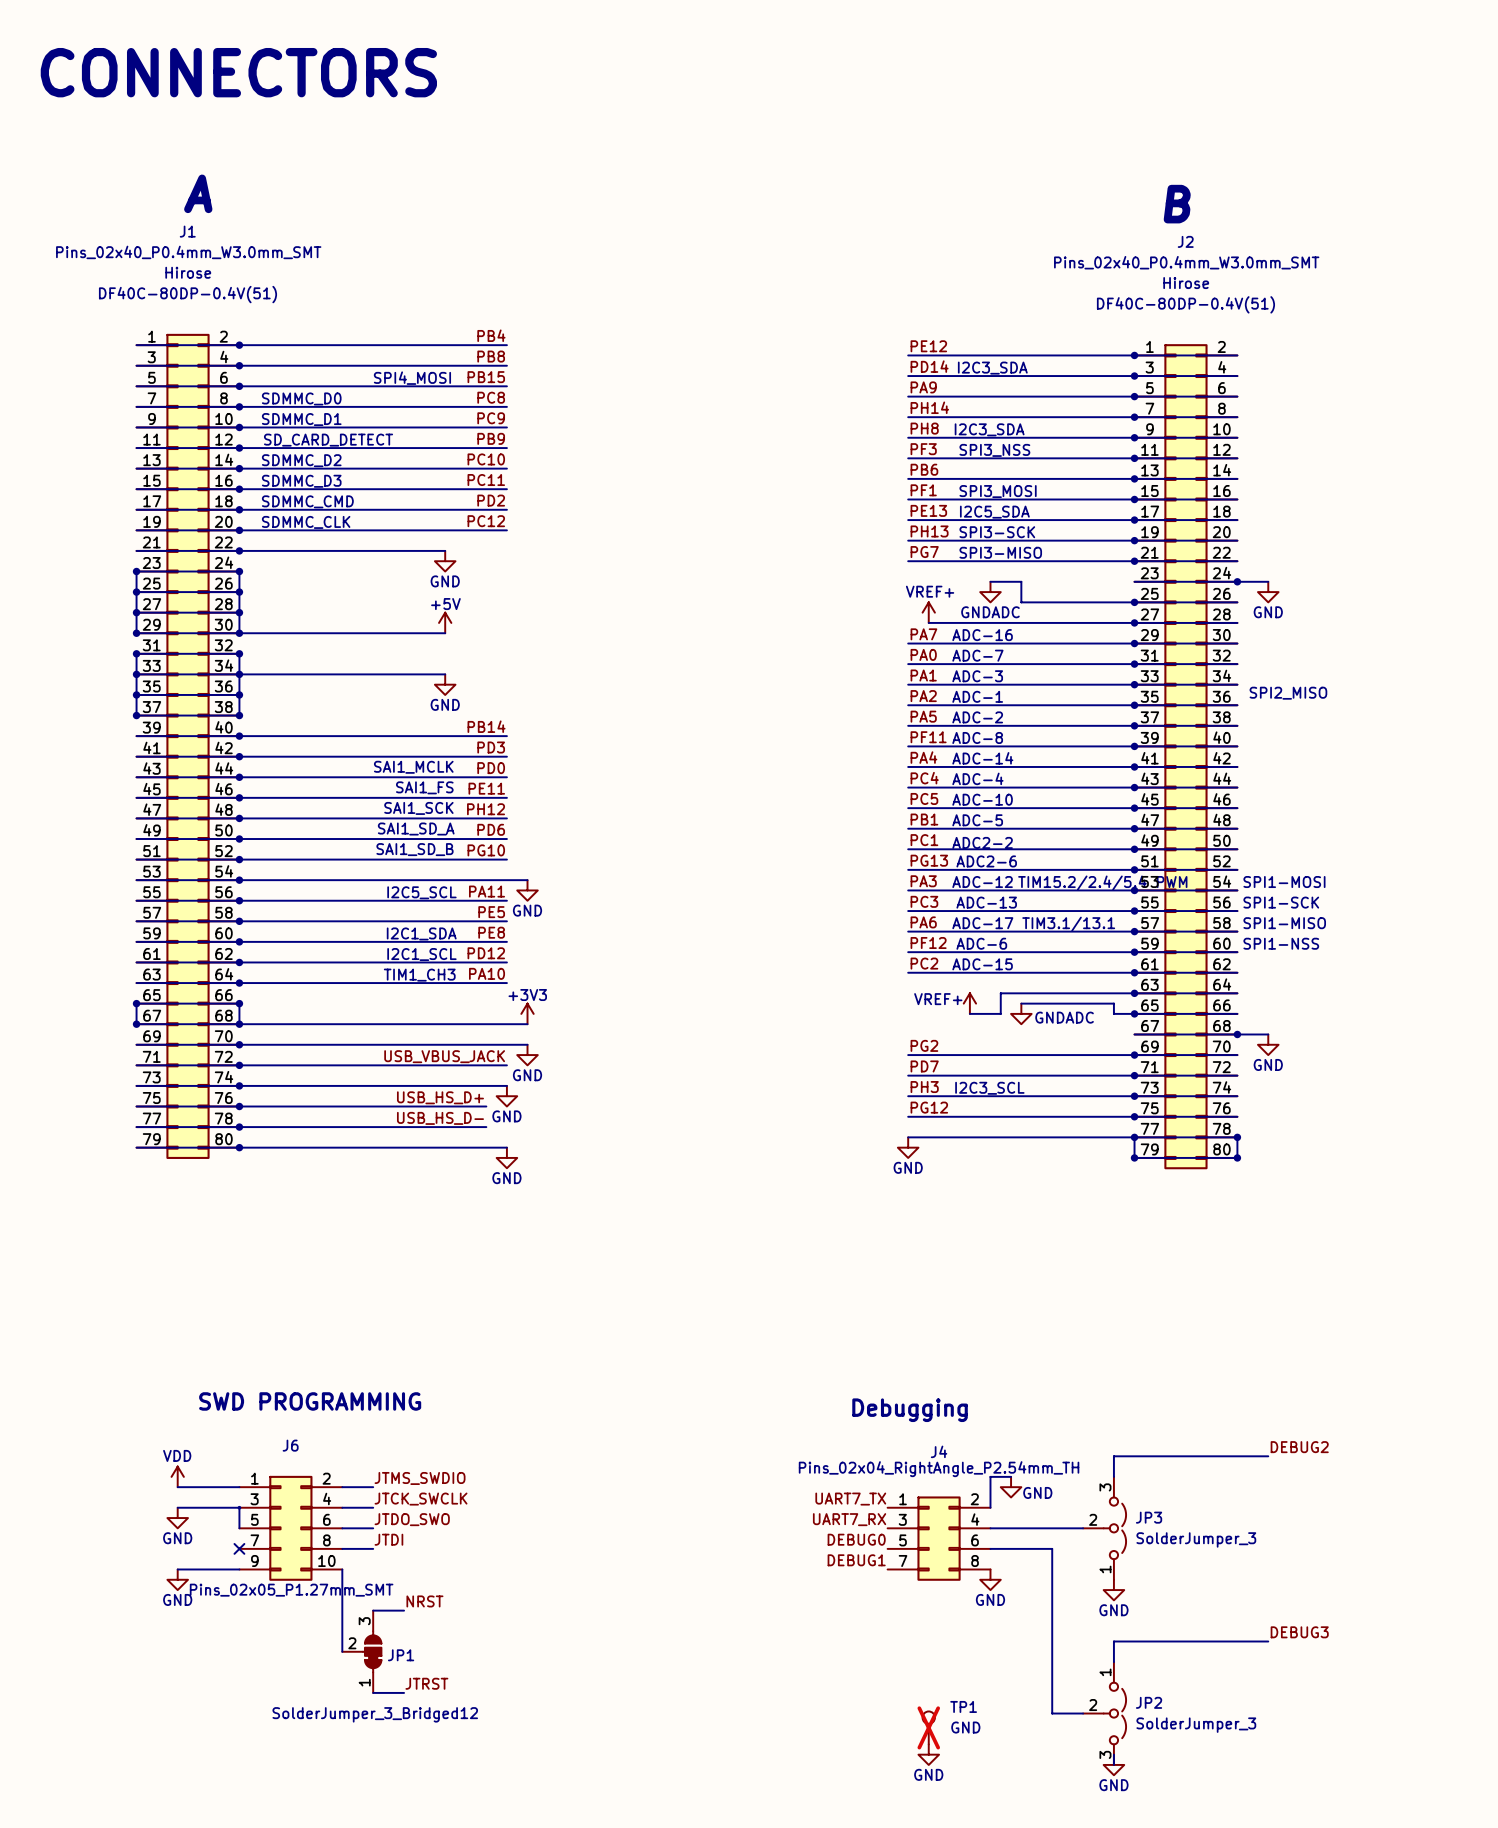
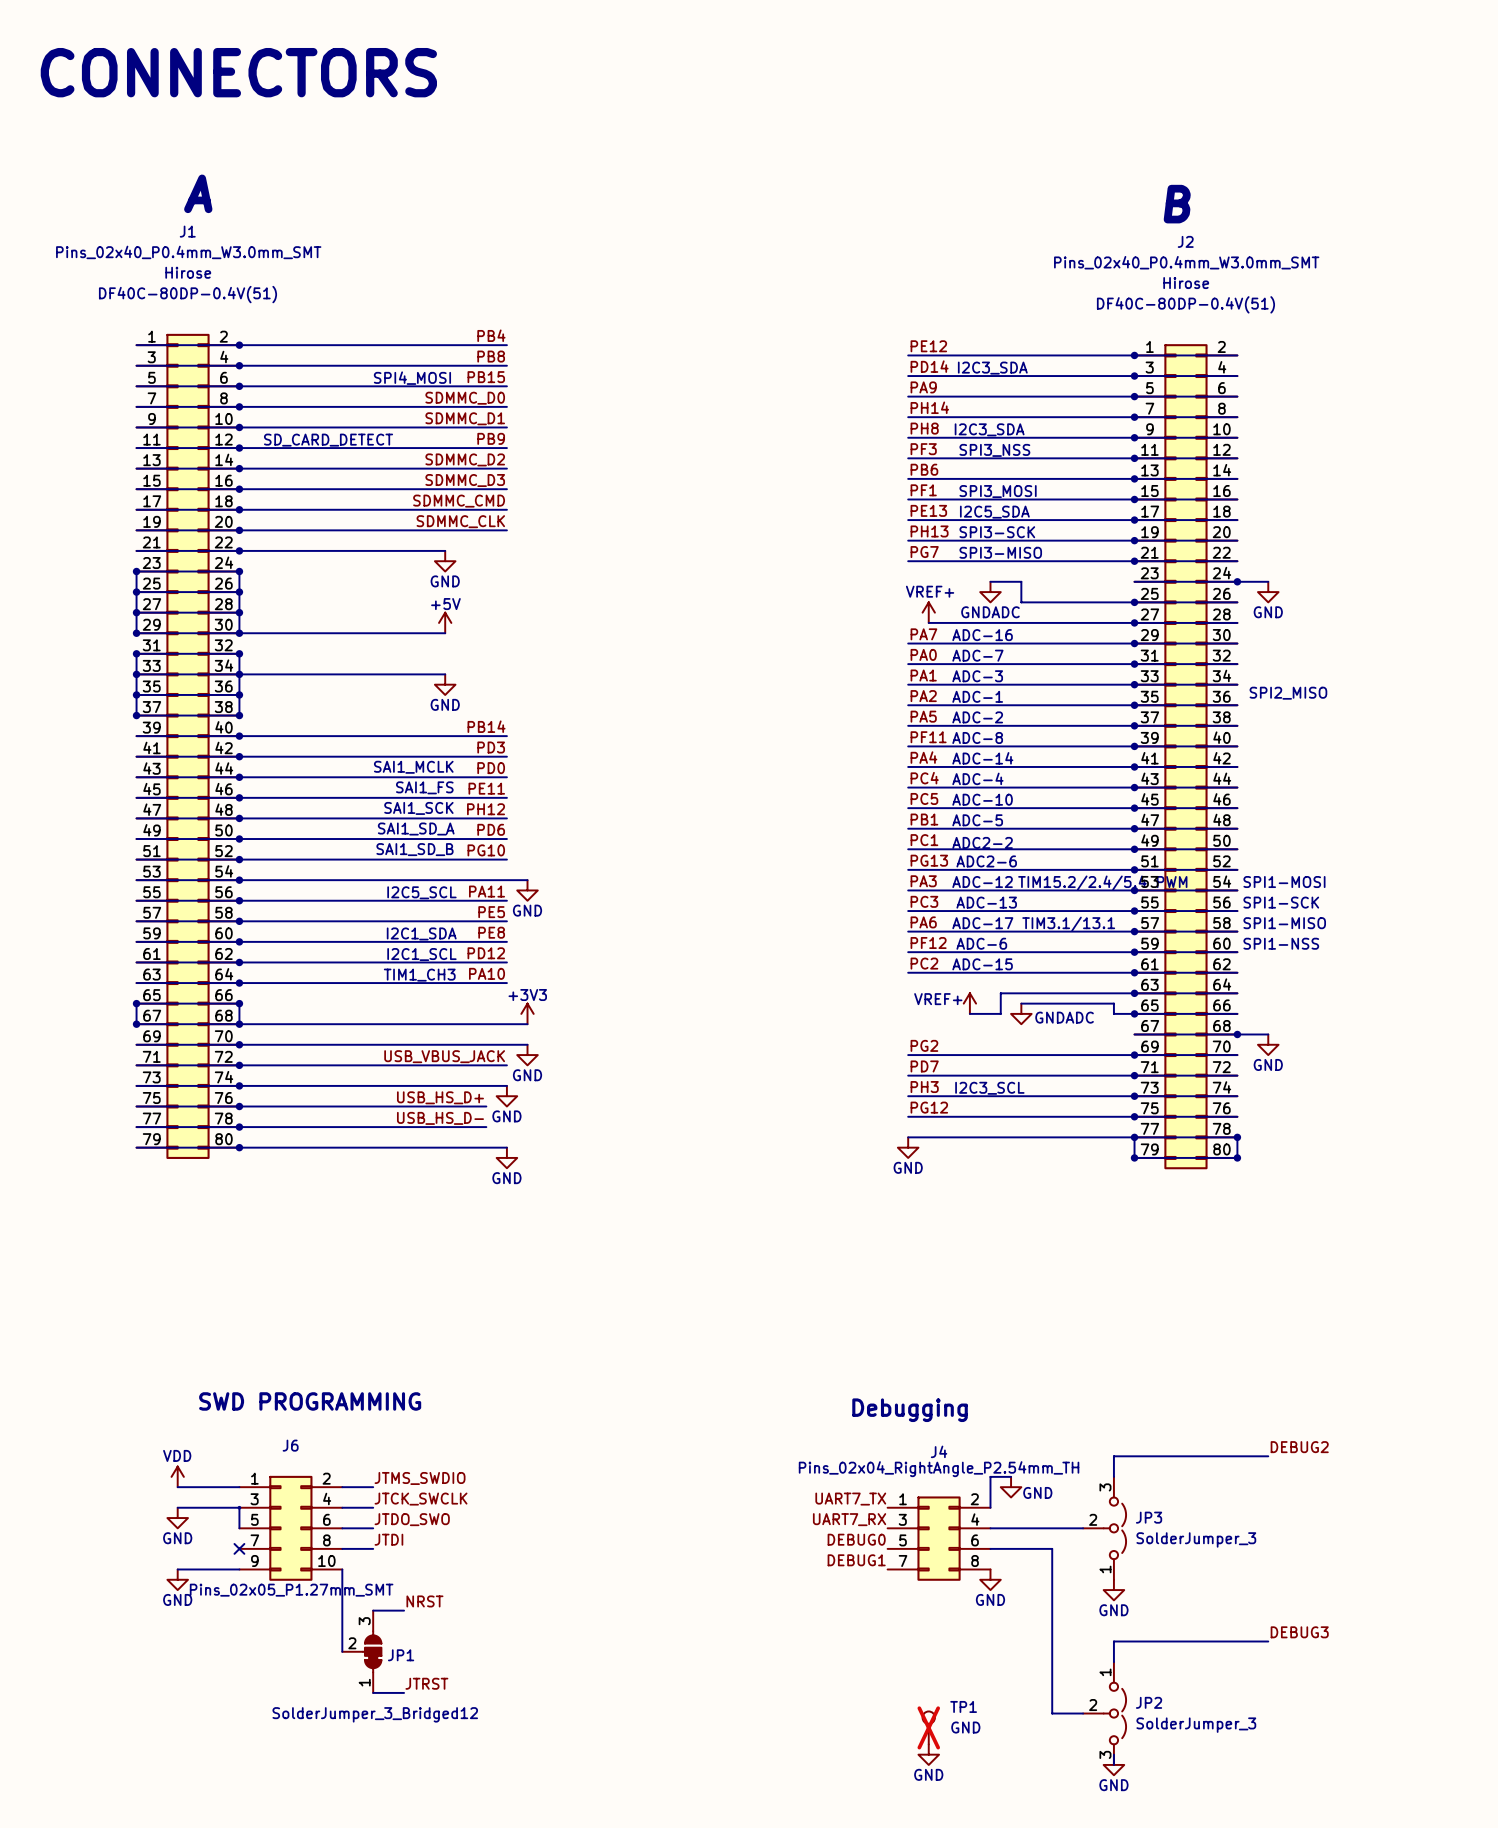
label: PC8 (491, 397) -> SDMMC_D0 (465, 398)
text: SDMMC_D0 (301, 398) -> none
label: PC9 (491, 418) -> SDMMC_D1 (465, 418)
text: SDMMC_D1 (301, 419) -> none
label: PC10 (486, 459) -> SDMMC_D2 (465, 459)
text: SDMMC_D2 (301, 460) -> none
label: PC11 (486, 480) -> SDMMC_D3 (465, 480)
text: SDMMC_D3 (301, 481) -> none
label: PD2 (491, 500) -> SDMMC_CMD (459, 501)
text: SDMMC_CMD (307, 501) -> none
label: PC12 (486, 521) -> SDMMC_CLK (460, 521)
text: SDMMC_CLK (306, 522) -> none

